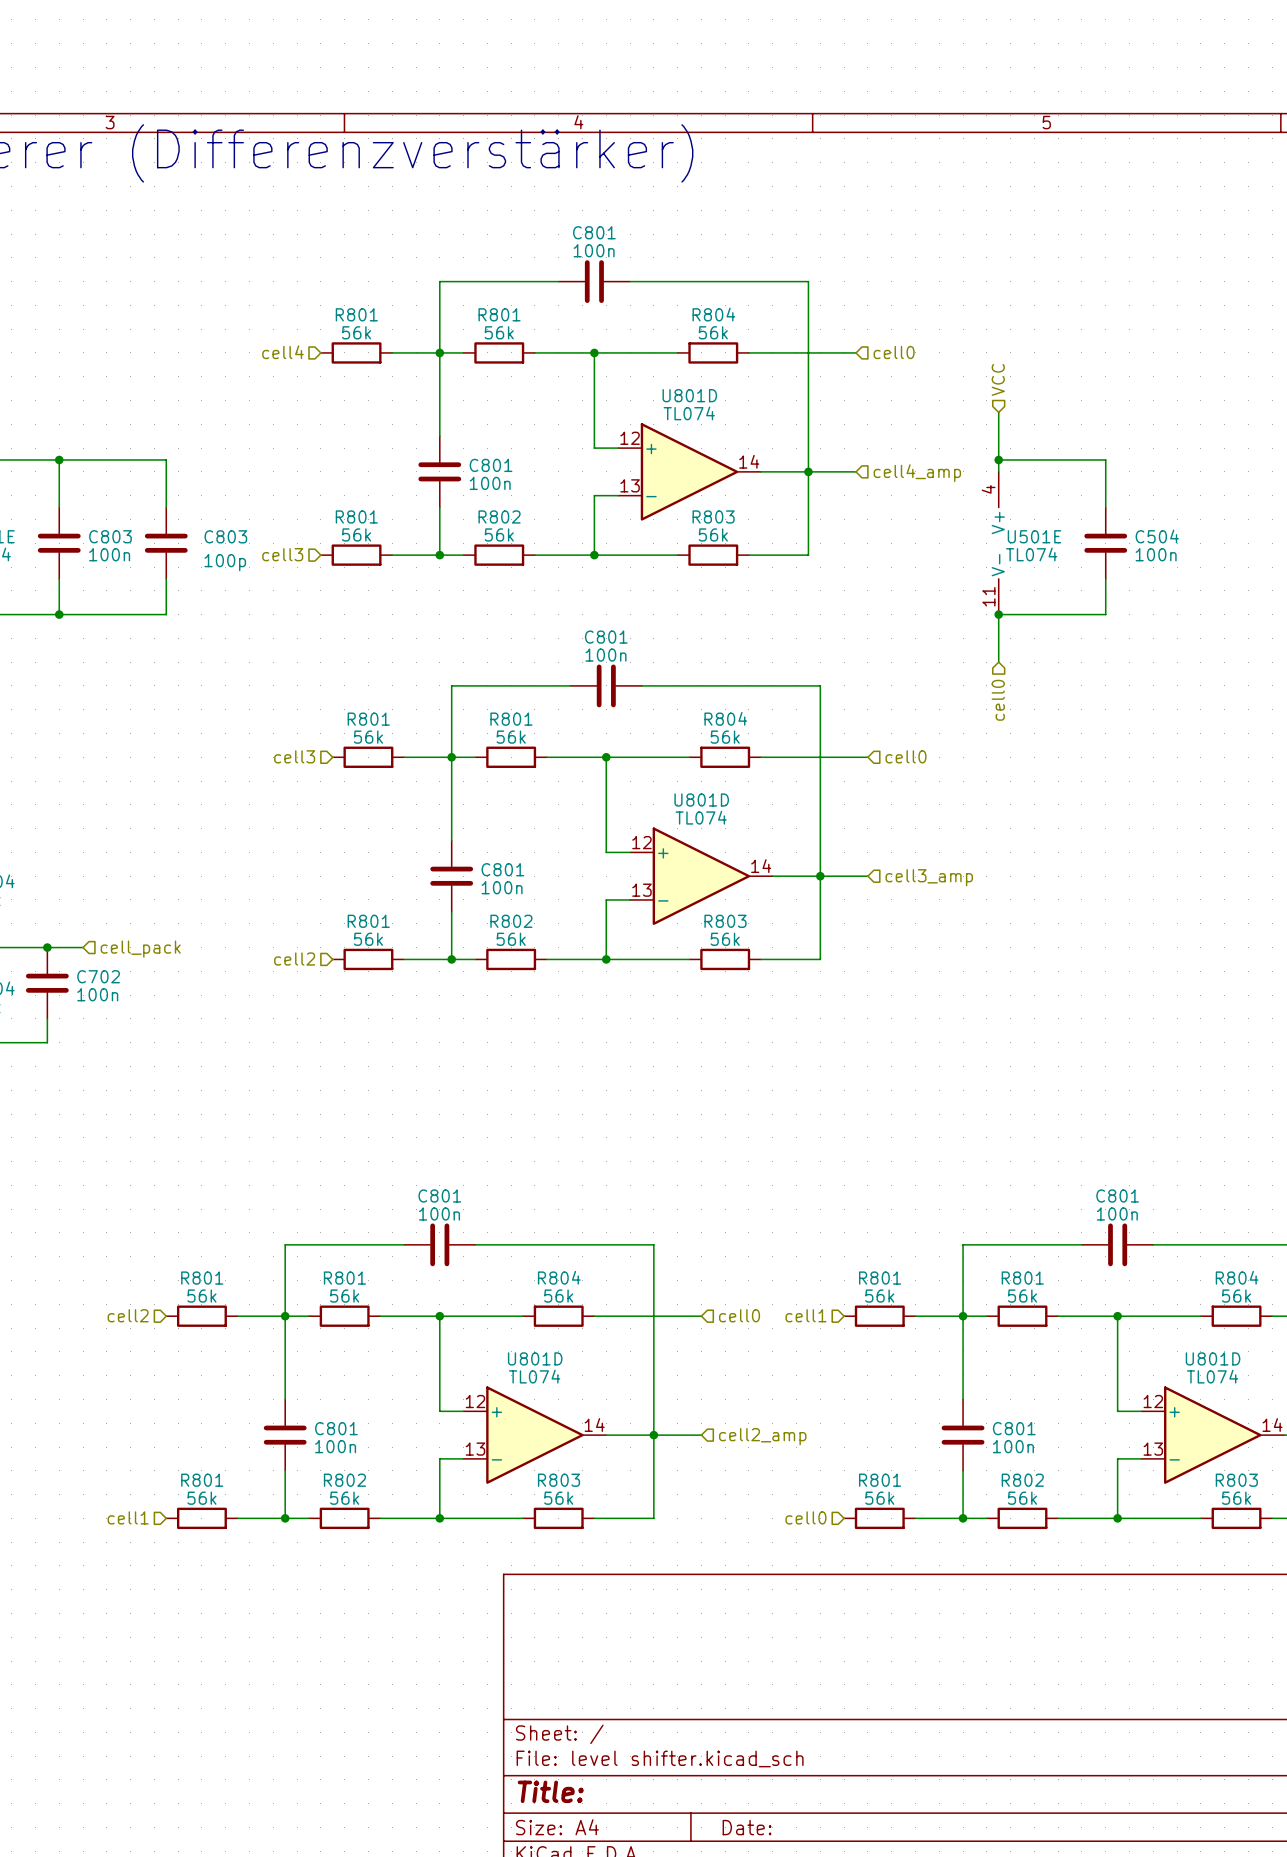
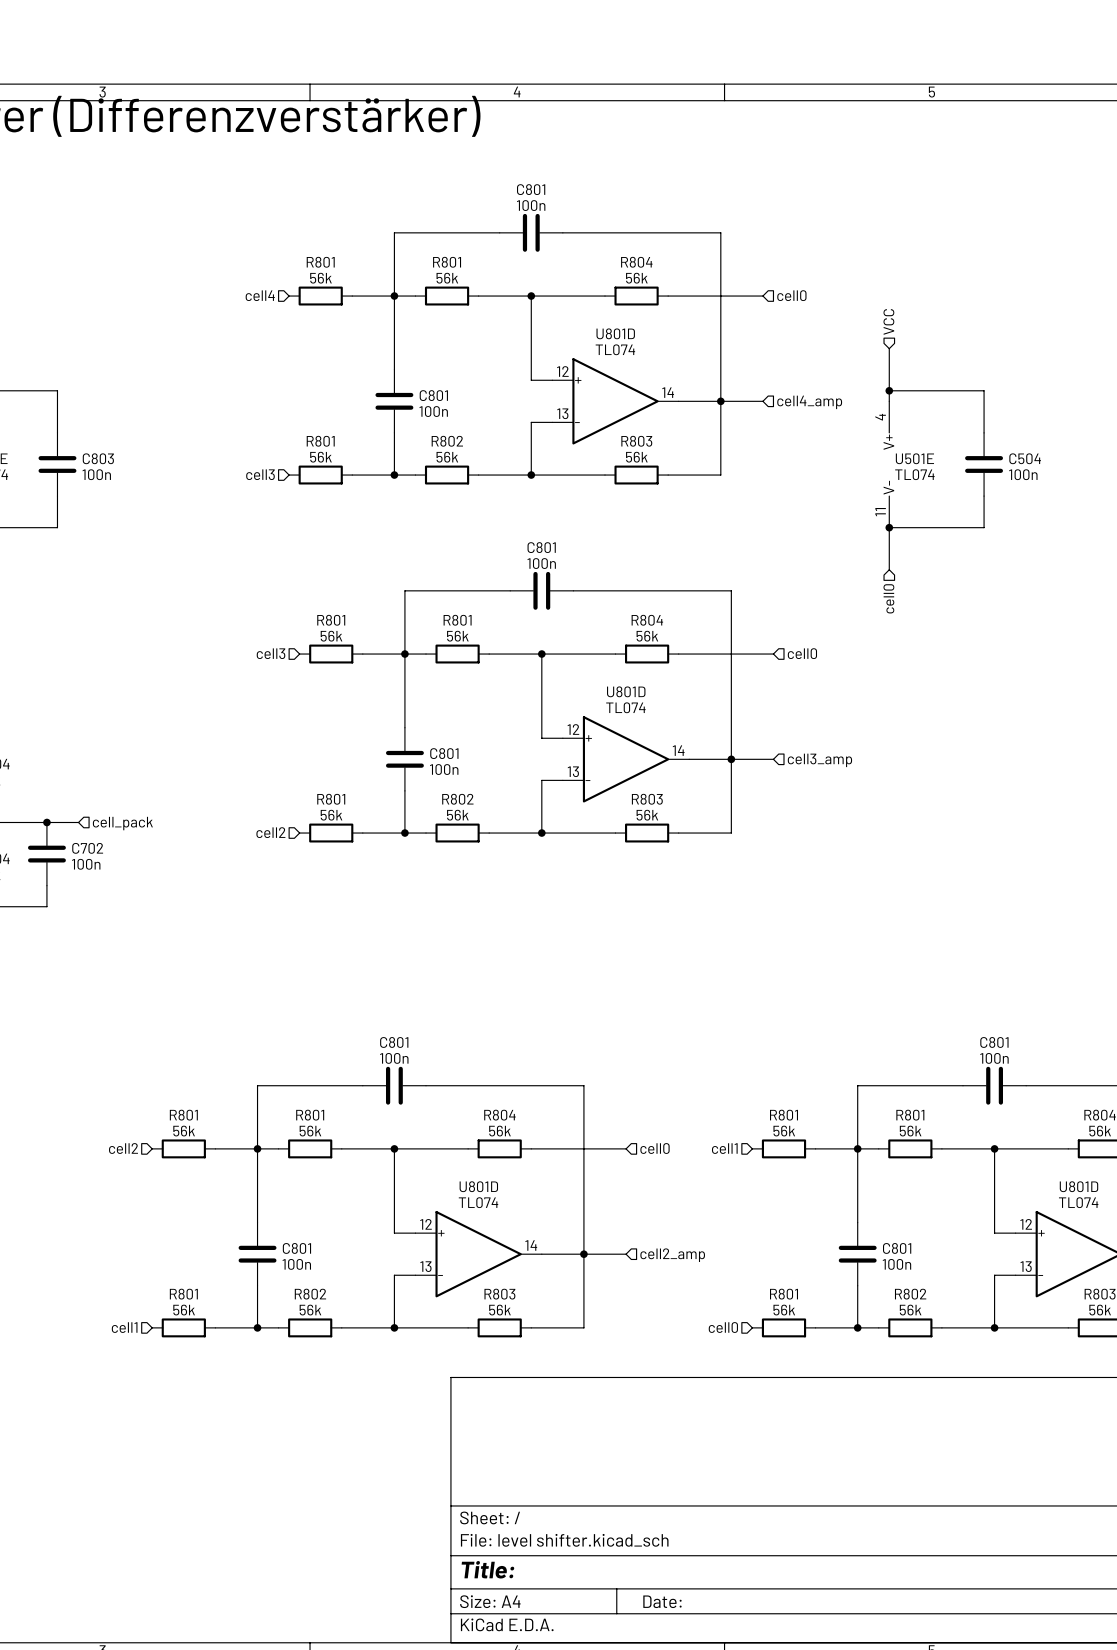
wire: (59, 459) (166, 459) (166, 507) -> none
junction: (59, 459) -> none
C803: 100p (166, 543) -> none
wire: (166, 578) (166, 614) (59, 614) -> none
junction: (59, 614) -> none

